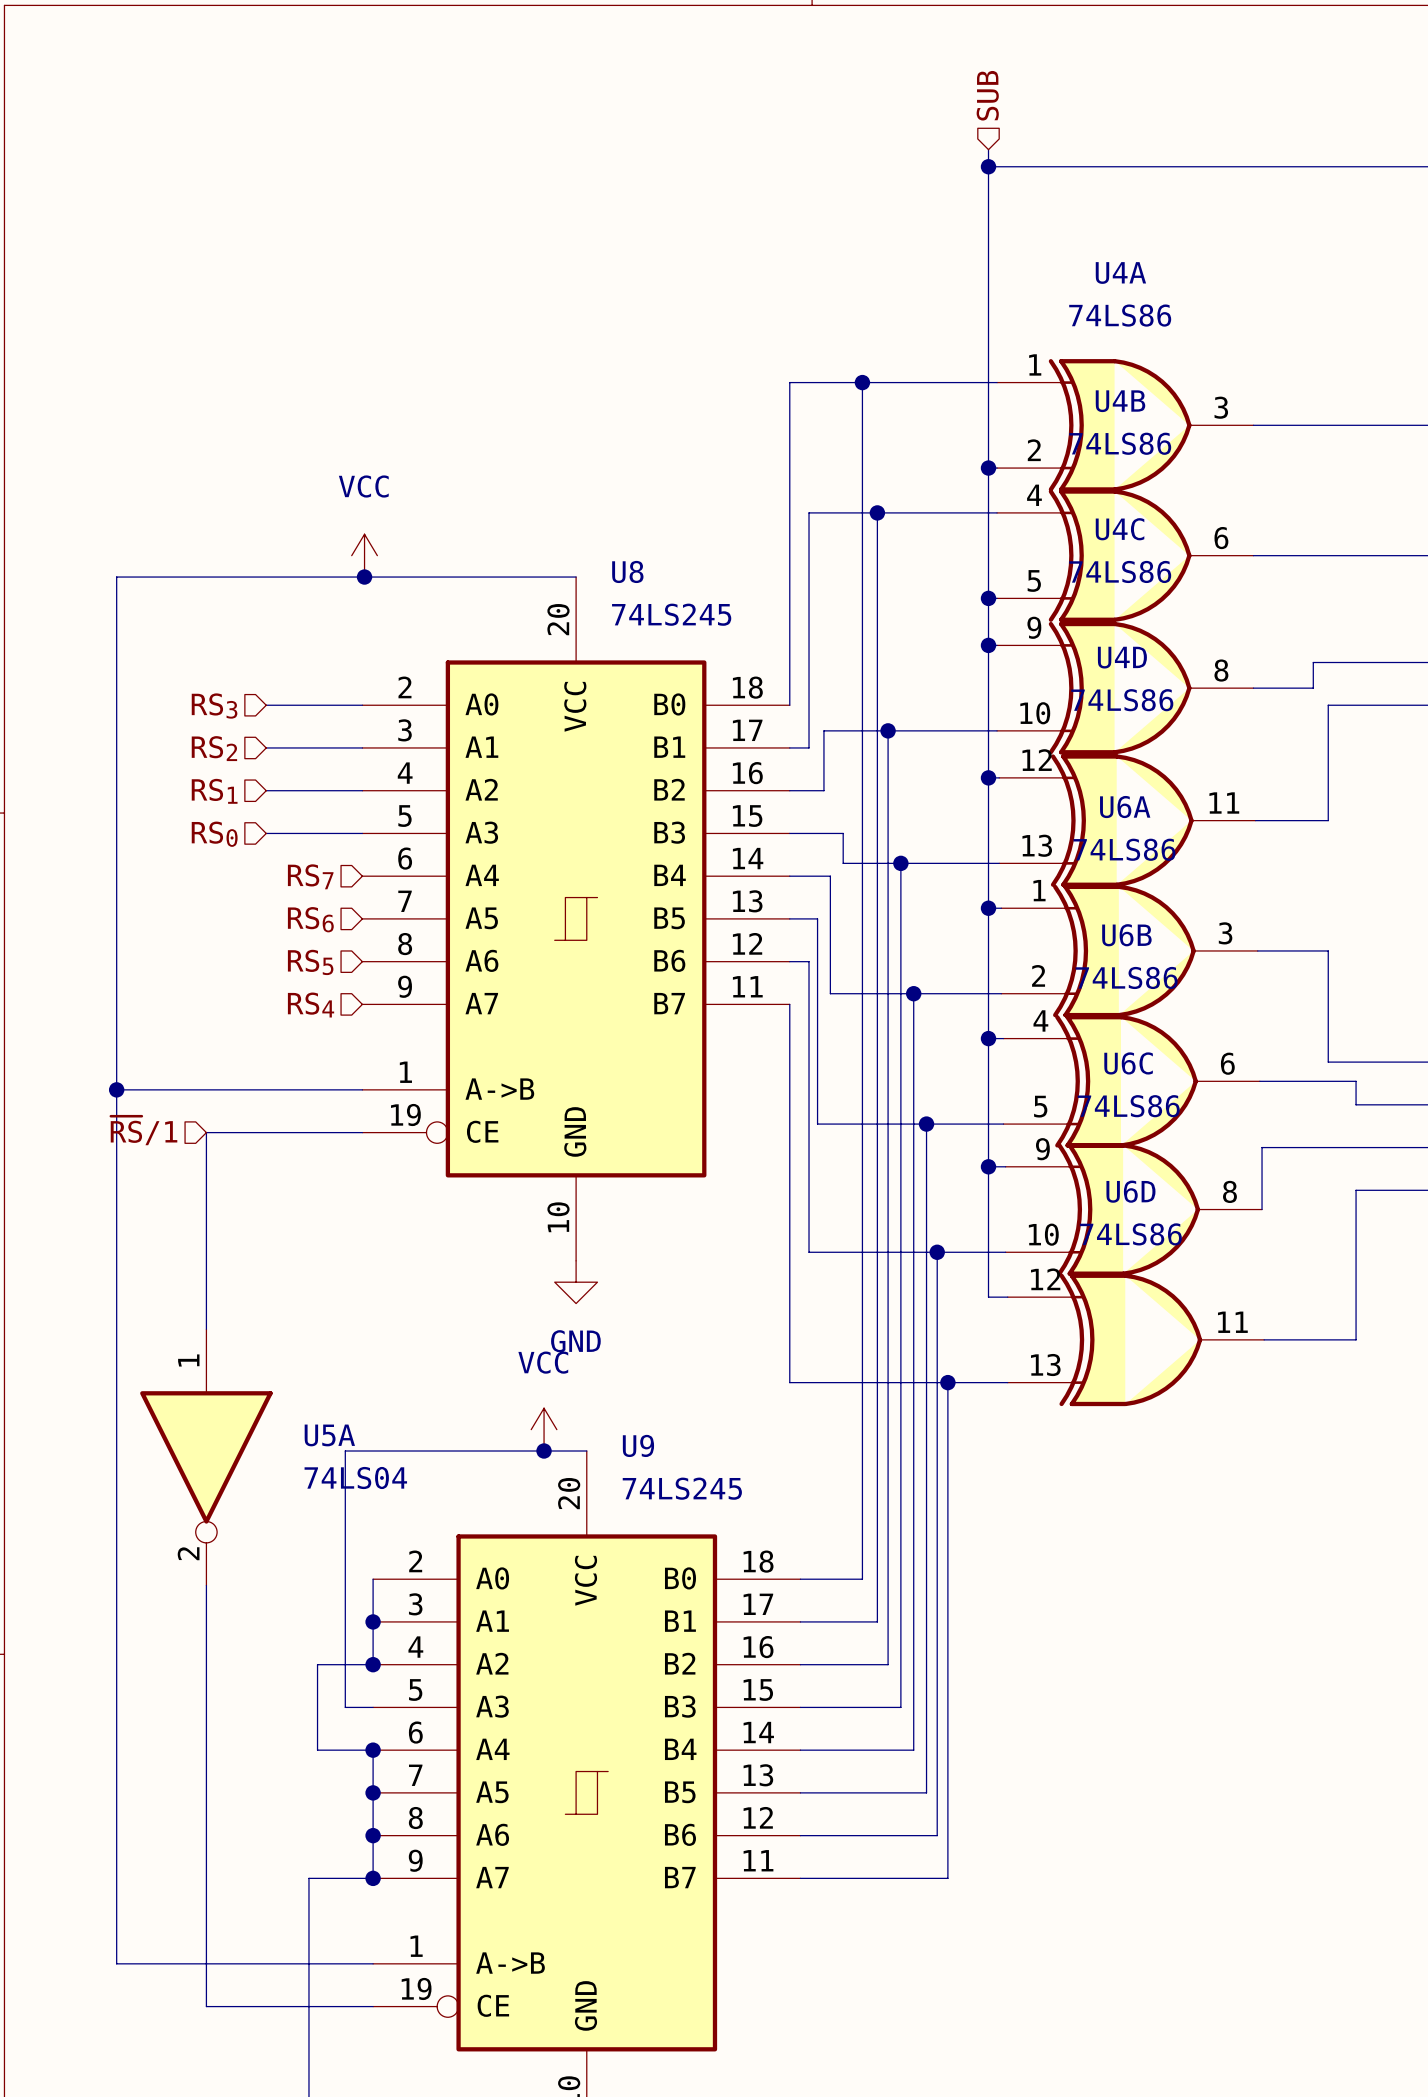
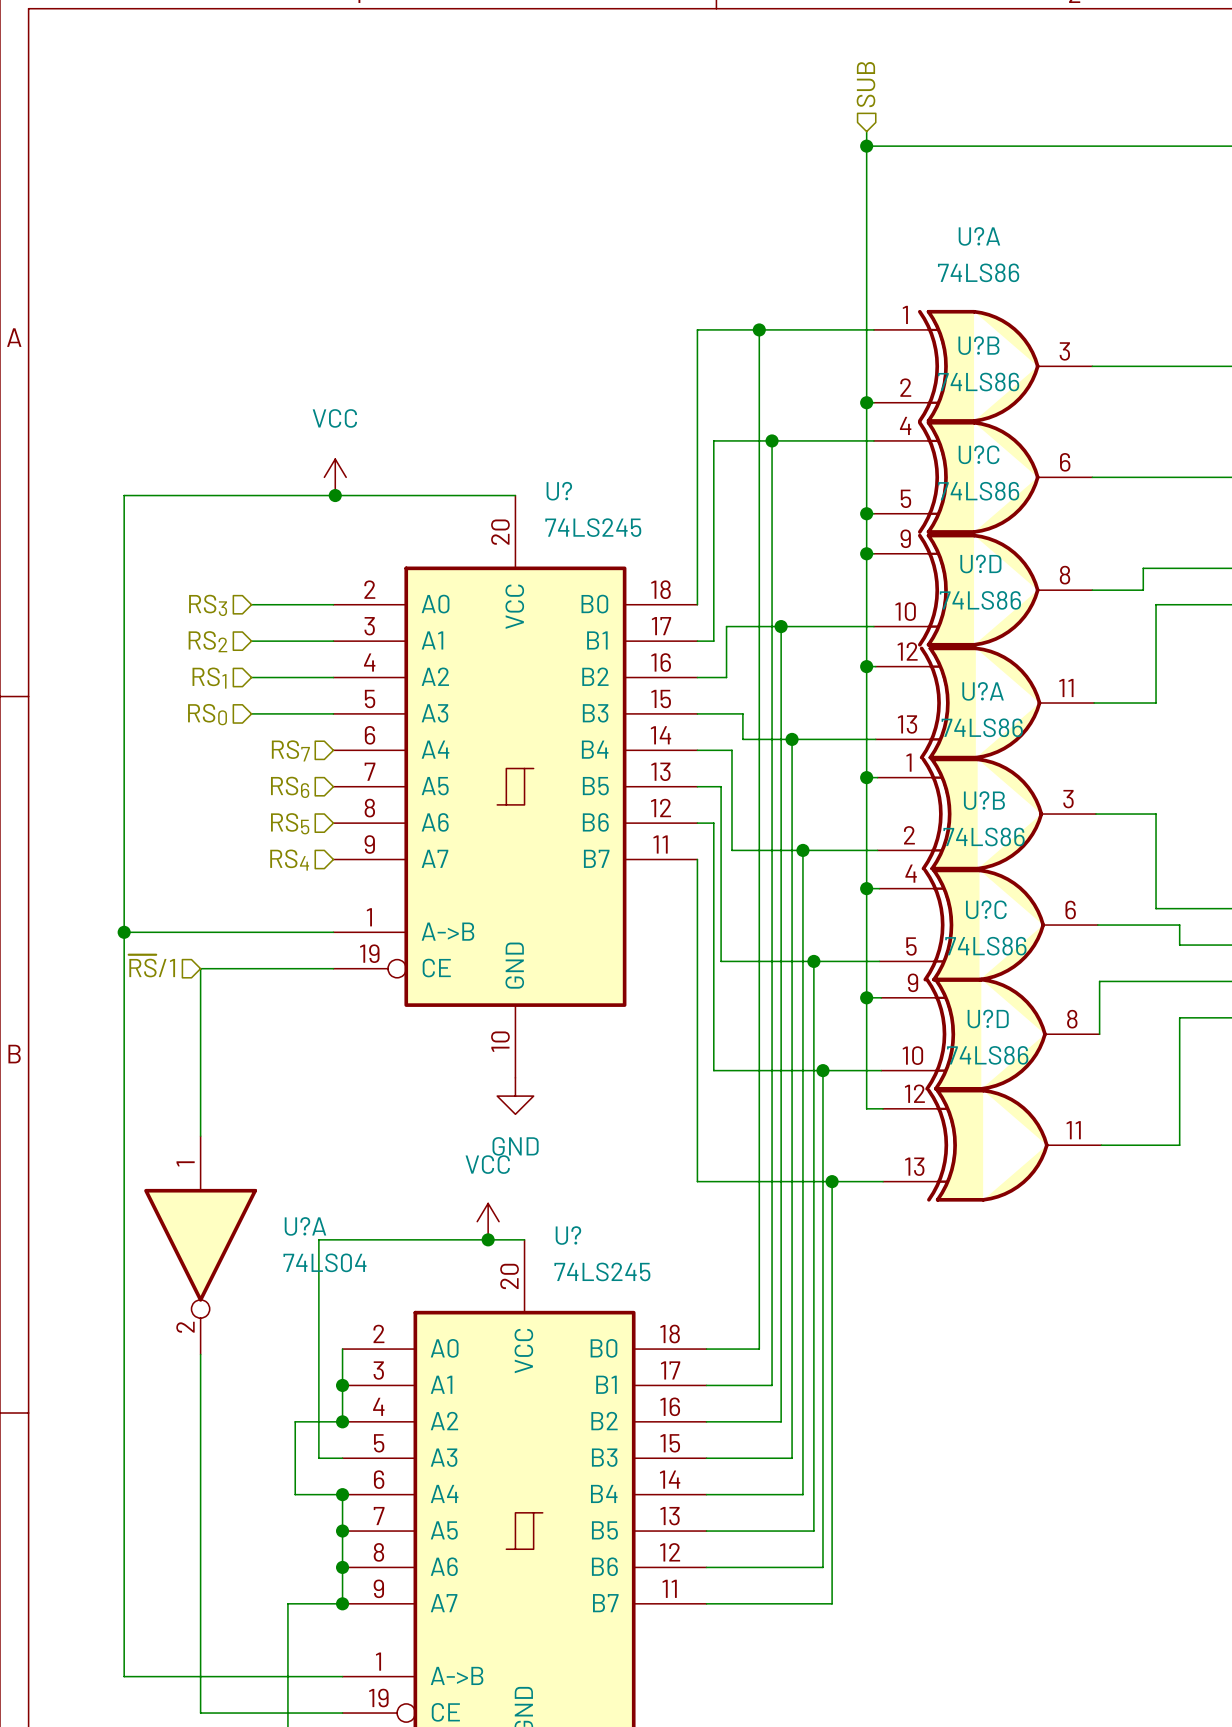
U4A name: U4A (1120, 273) -> U?A (979, 236)
U4B name: U4B (1120, 401) -> U?B (978, 345)
U4C name: U4C (1120, 529) -> U?C (979, 454)
U8 name: U8 (627, 571) -> U? (559, 491)
U4D name: U4D (1122, 657) -> U?D (980, 564)
U6A name: U6A (1125, 807) -> U?A (983, 691)
U6B name: U6B (1126, 935) -> U?B (984, 800)
U6C name: U6C (1128, 1063) -> U?C (986, 909)
U6D name: U6D (1130, 1191) -> U?D (988, 1018)
U5A name: U5A (329, 1435) -> U?A (305, 1226)
U9 name: U9 (638, 1445) -> U? (568, 1235)

